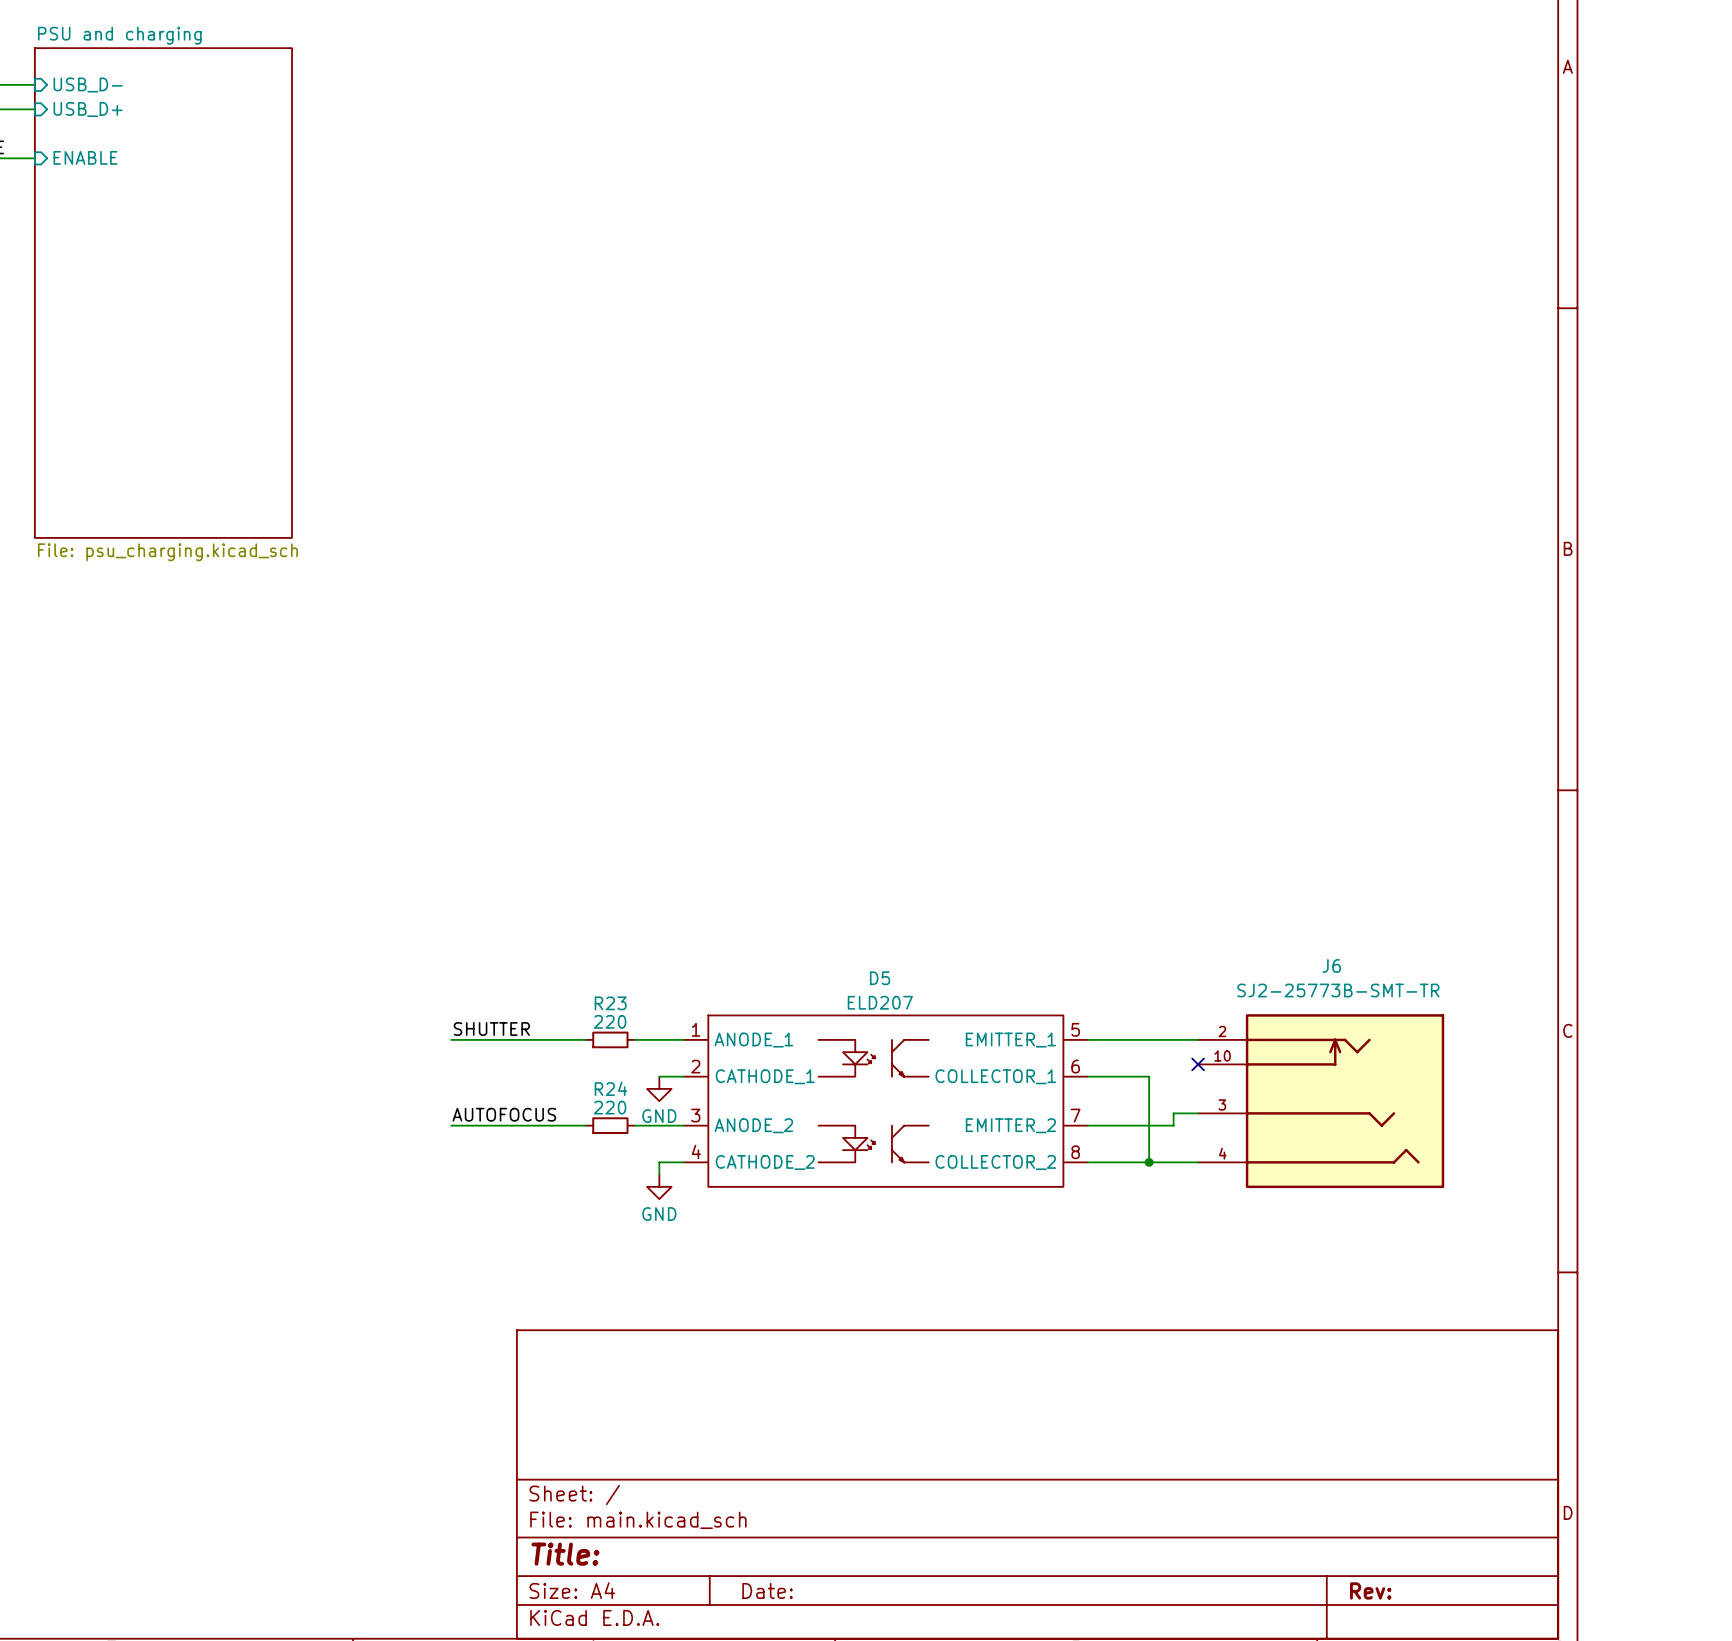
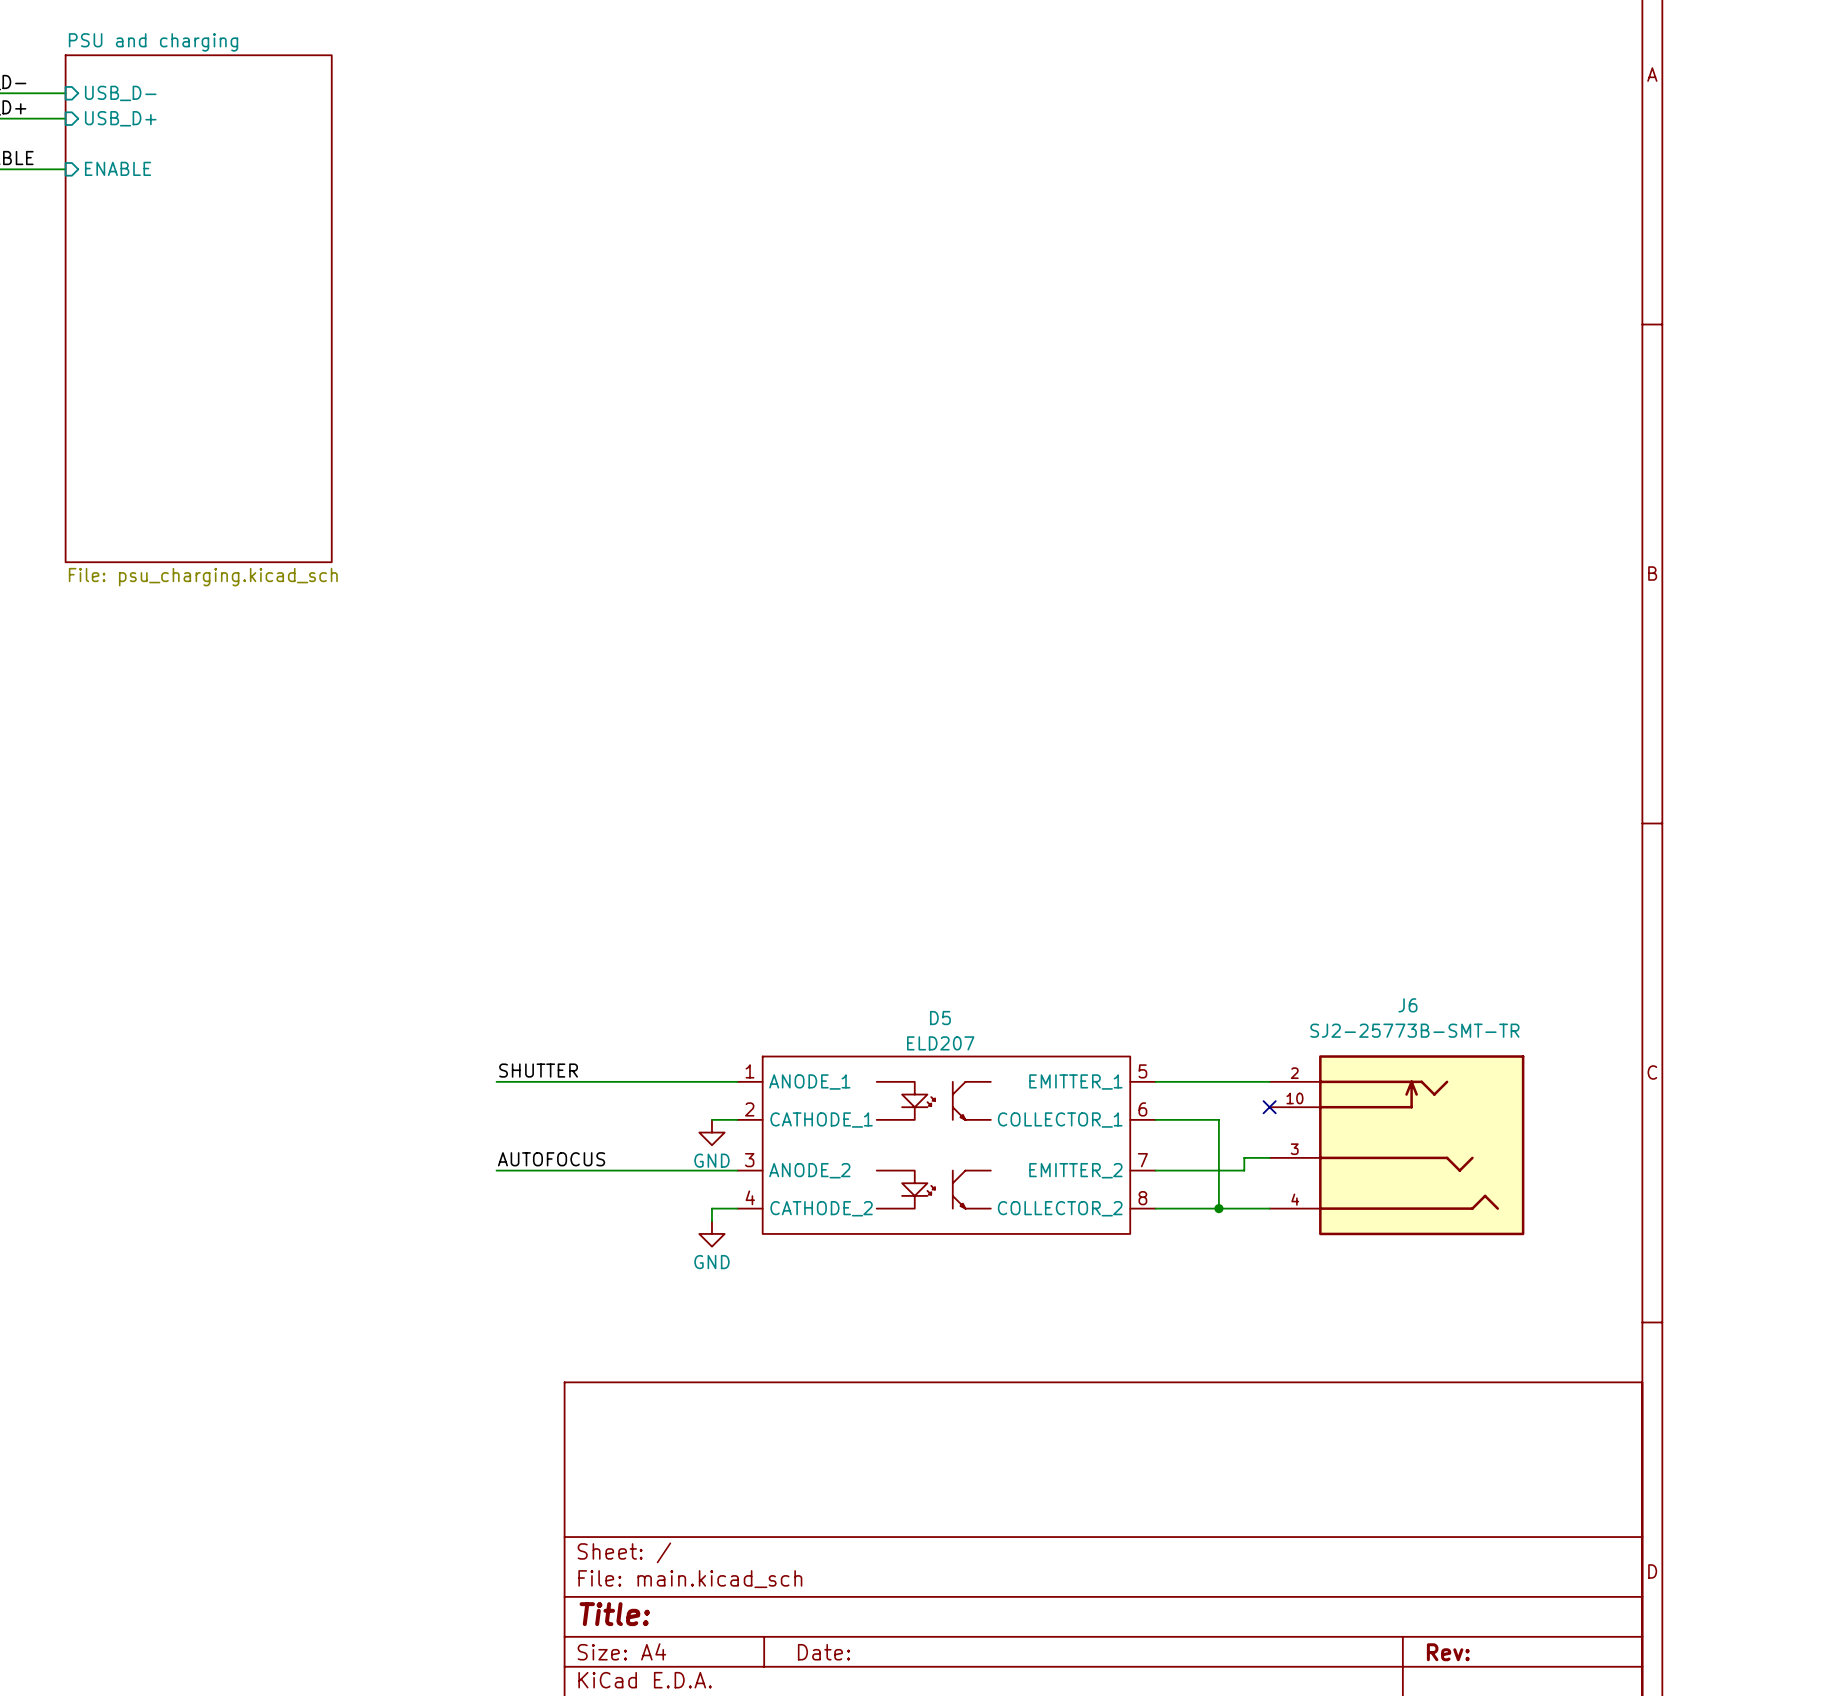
wire: none -> (635, 1081) (686, 1081)
R23: 220 (610, 1039) -> none
wire: none -> (635, 1170) (686, 1170)
R24: 220 (610, 1125) -> none

